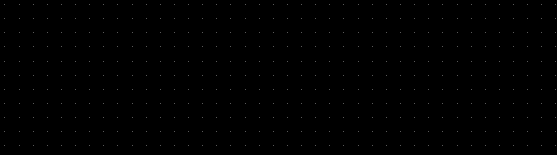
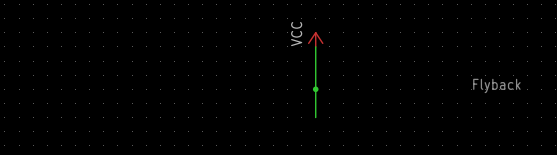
power symbol: none -> VCC (315, 39)
wire: none -> (315, 46) (315, 117)
text: none -> Flyback (496, 85)
junction: none -> (315, 89)

